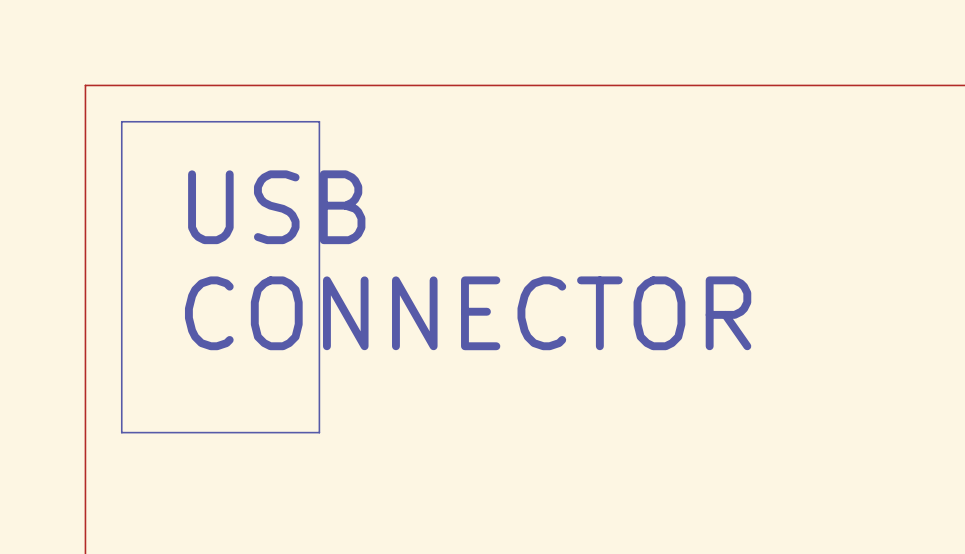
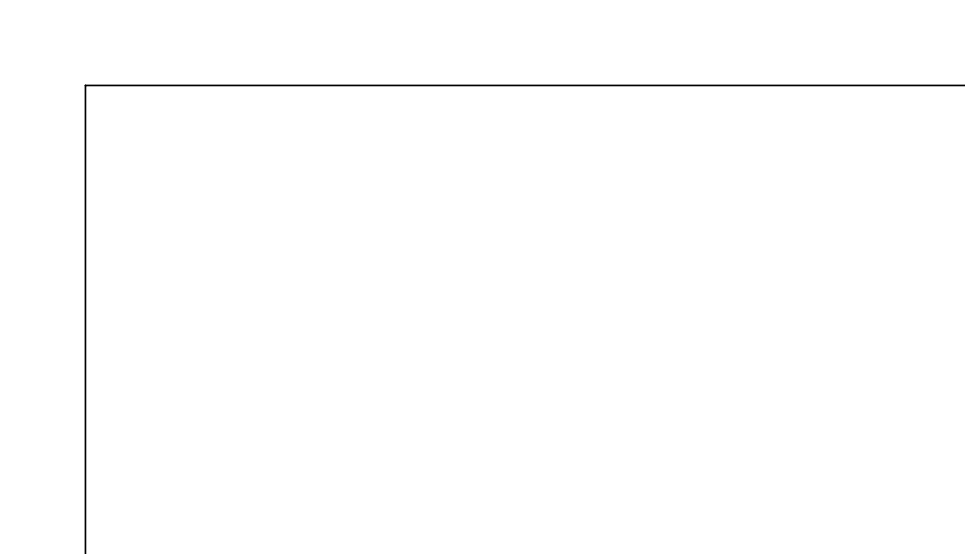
line: (121, 121) (319, 121) (319, 432) (121, 432) (121, 121) -> none
text: USB (276, 207) -> none
text: CONNECTOR (468, 313) -> none

